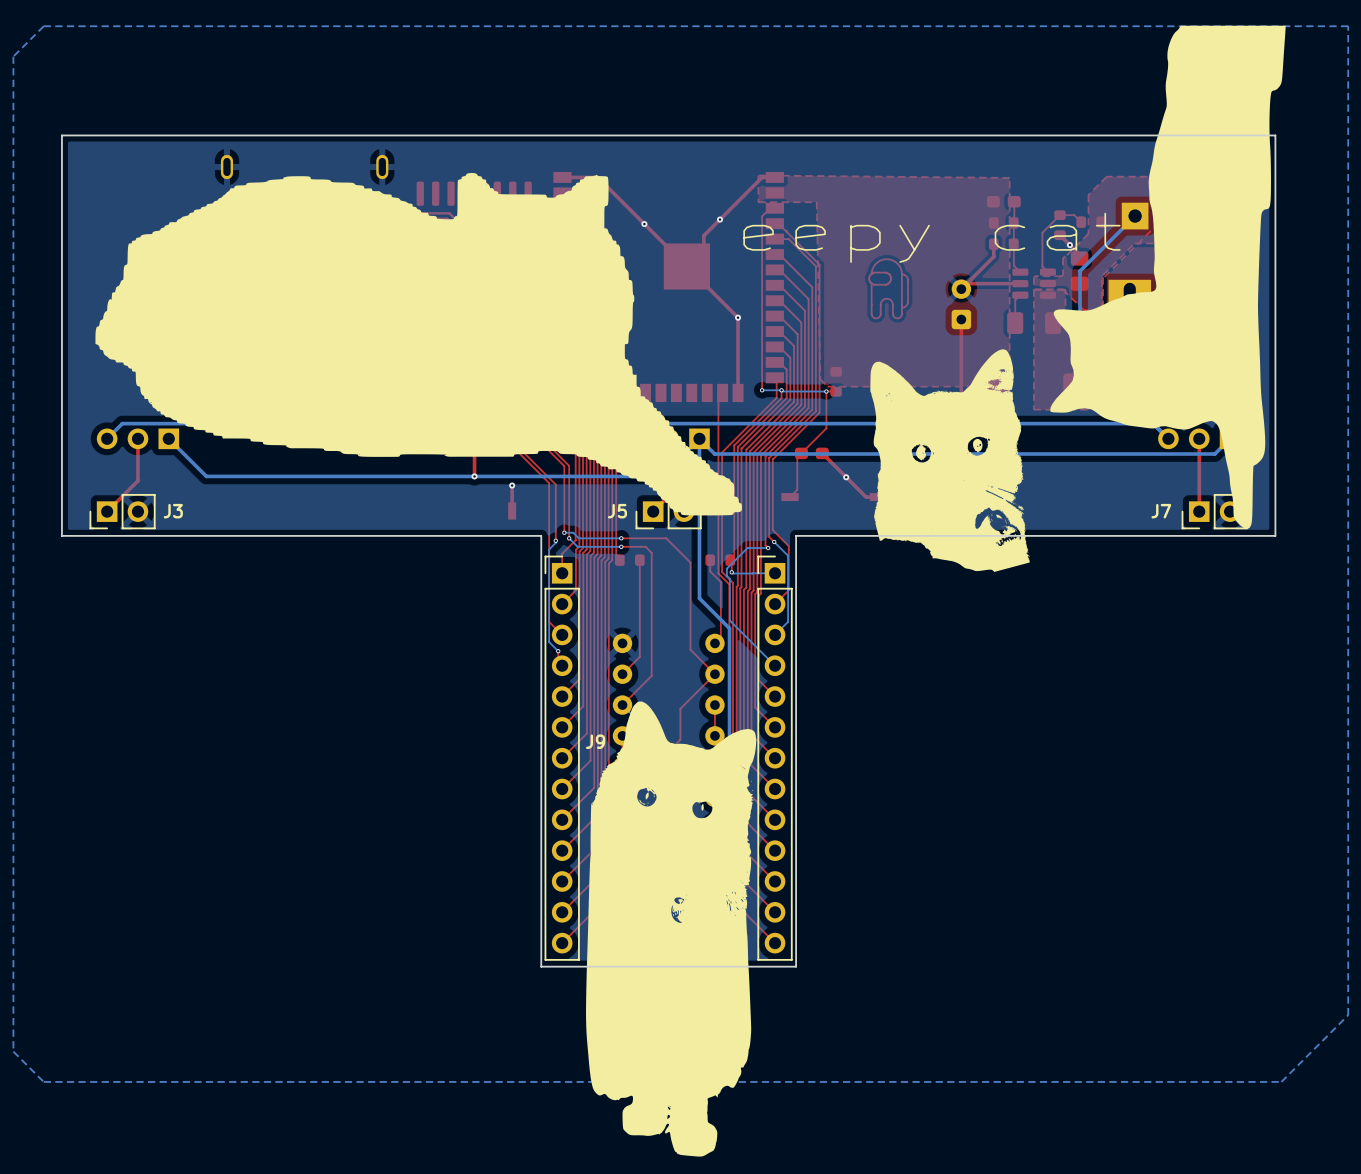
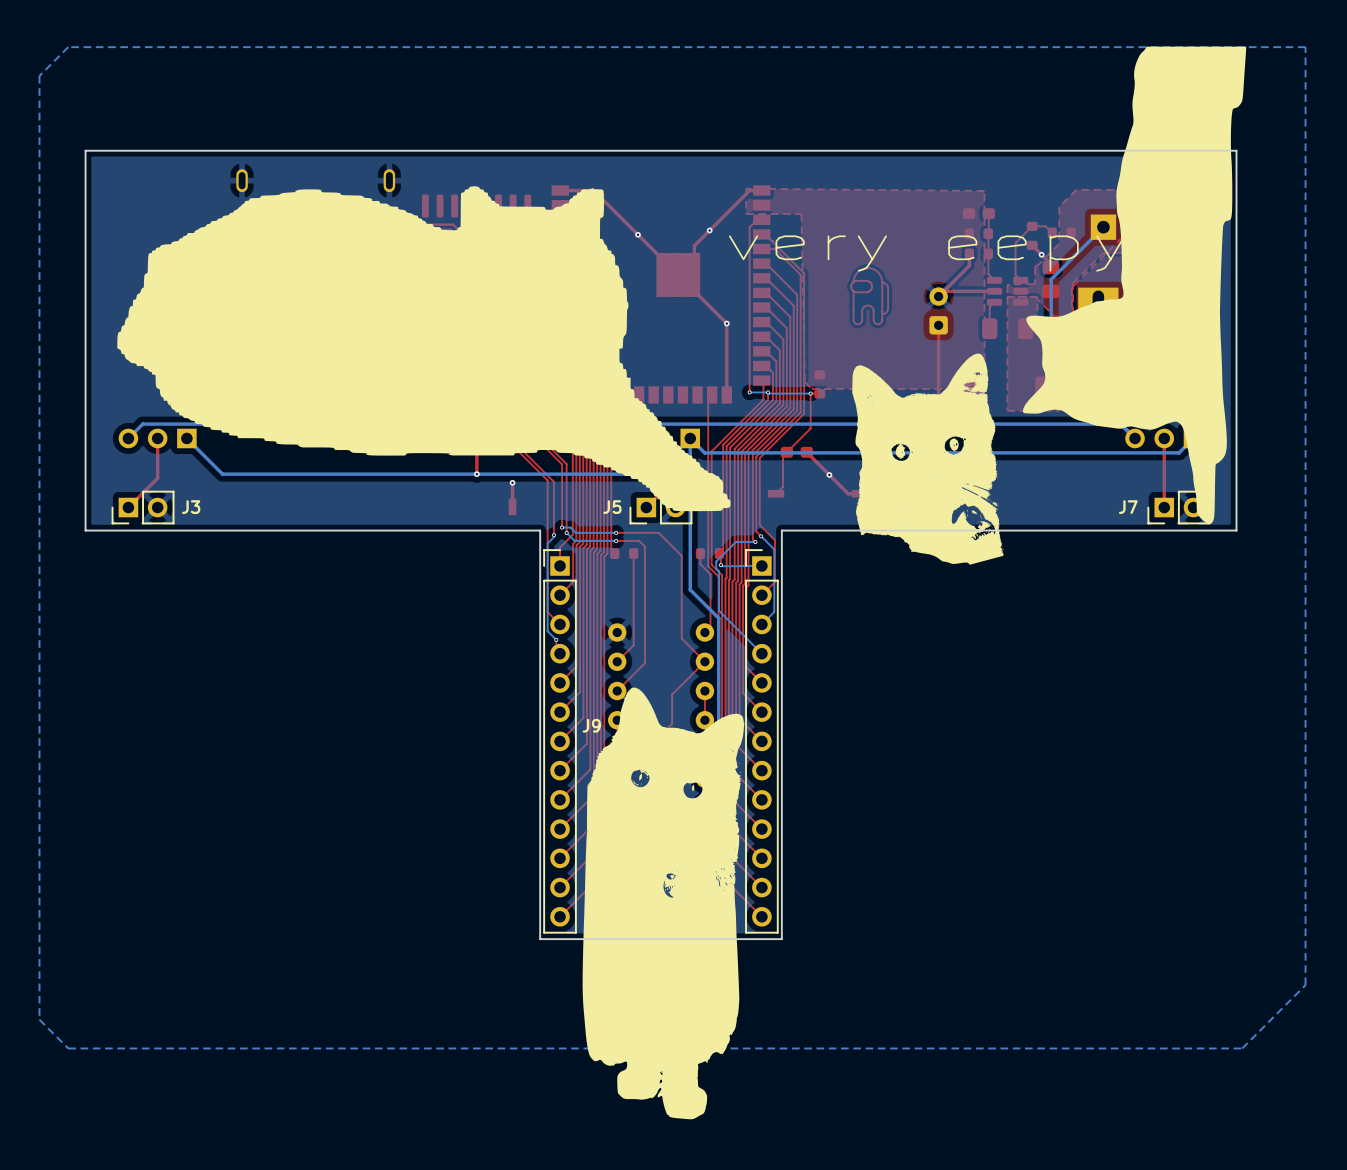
text: eepy cat (931, 237) -> very eepy (927, 253)

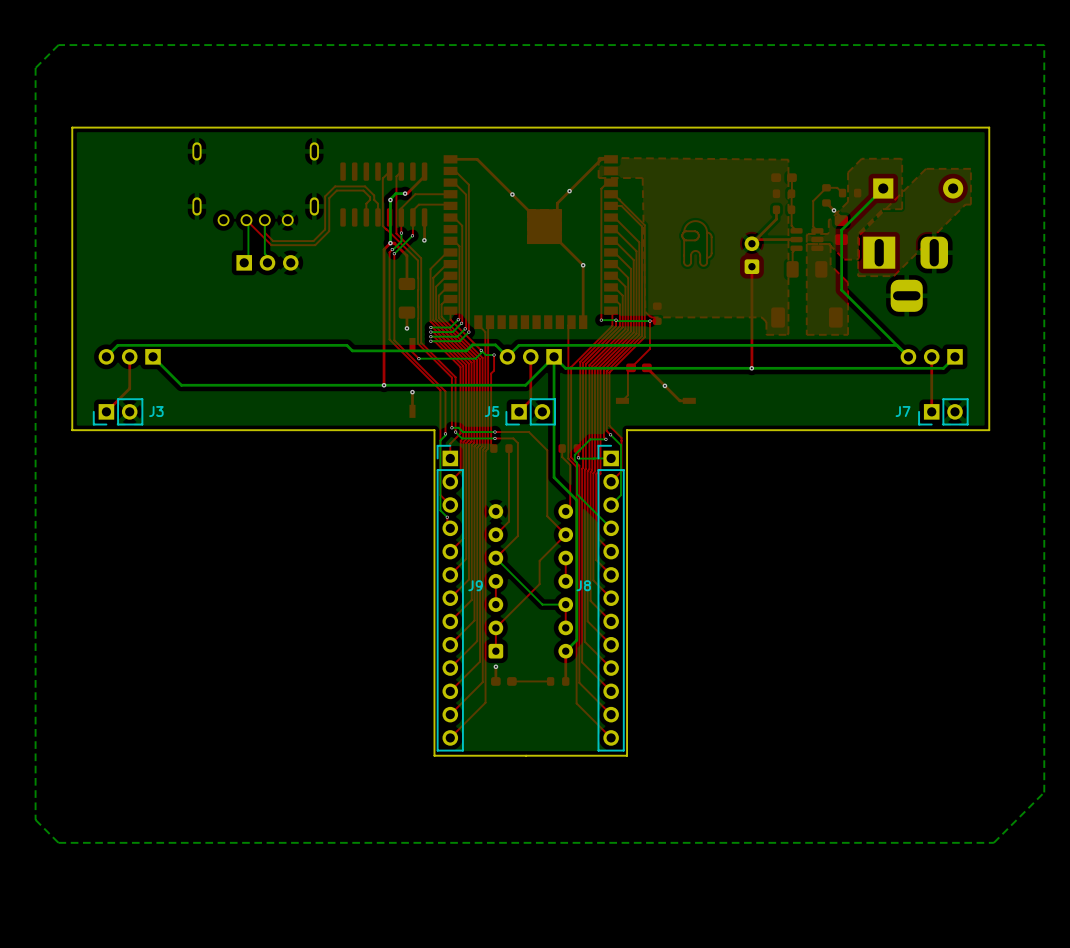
text: very eepy (927, 253) -> none
part: (1134, 285) -> none
part: (423, 348) -> none
drawing: [852, 353, 1004, 565] -> none
part: (663, 903) -> none

